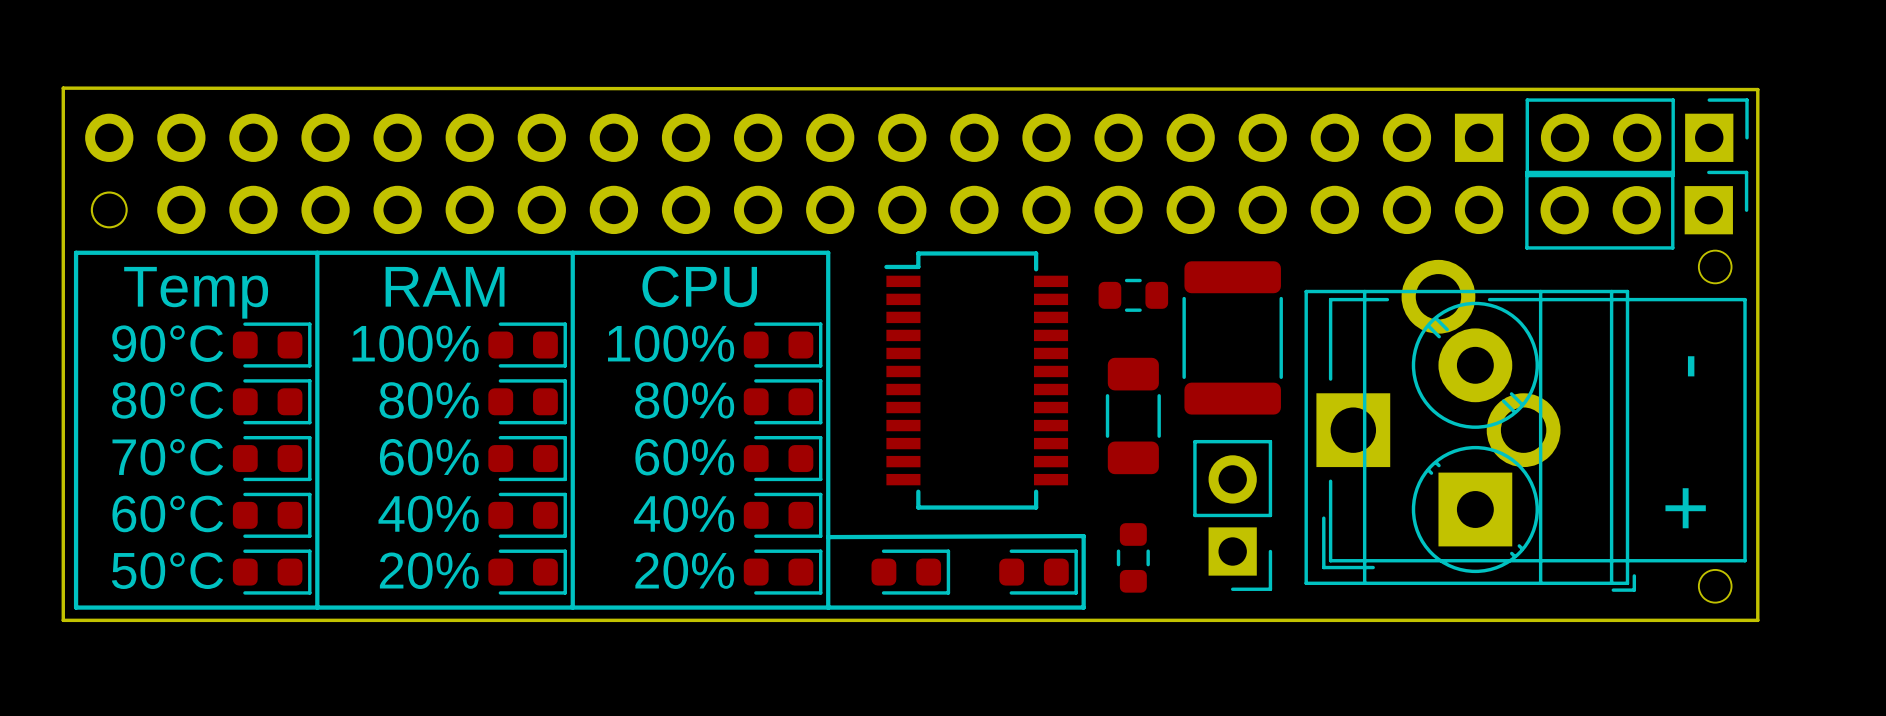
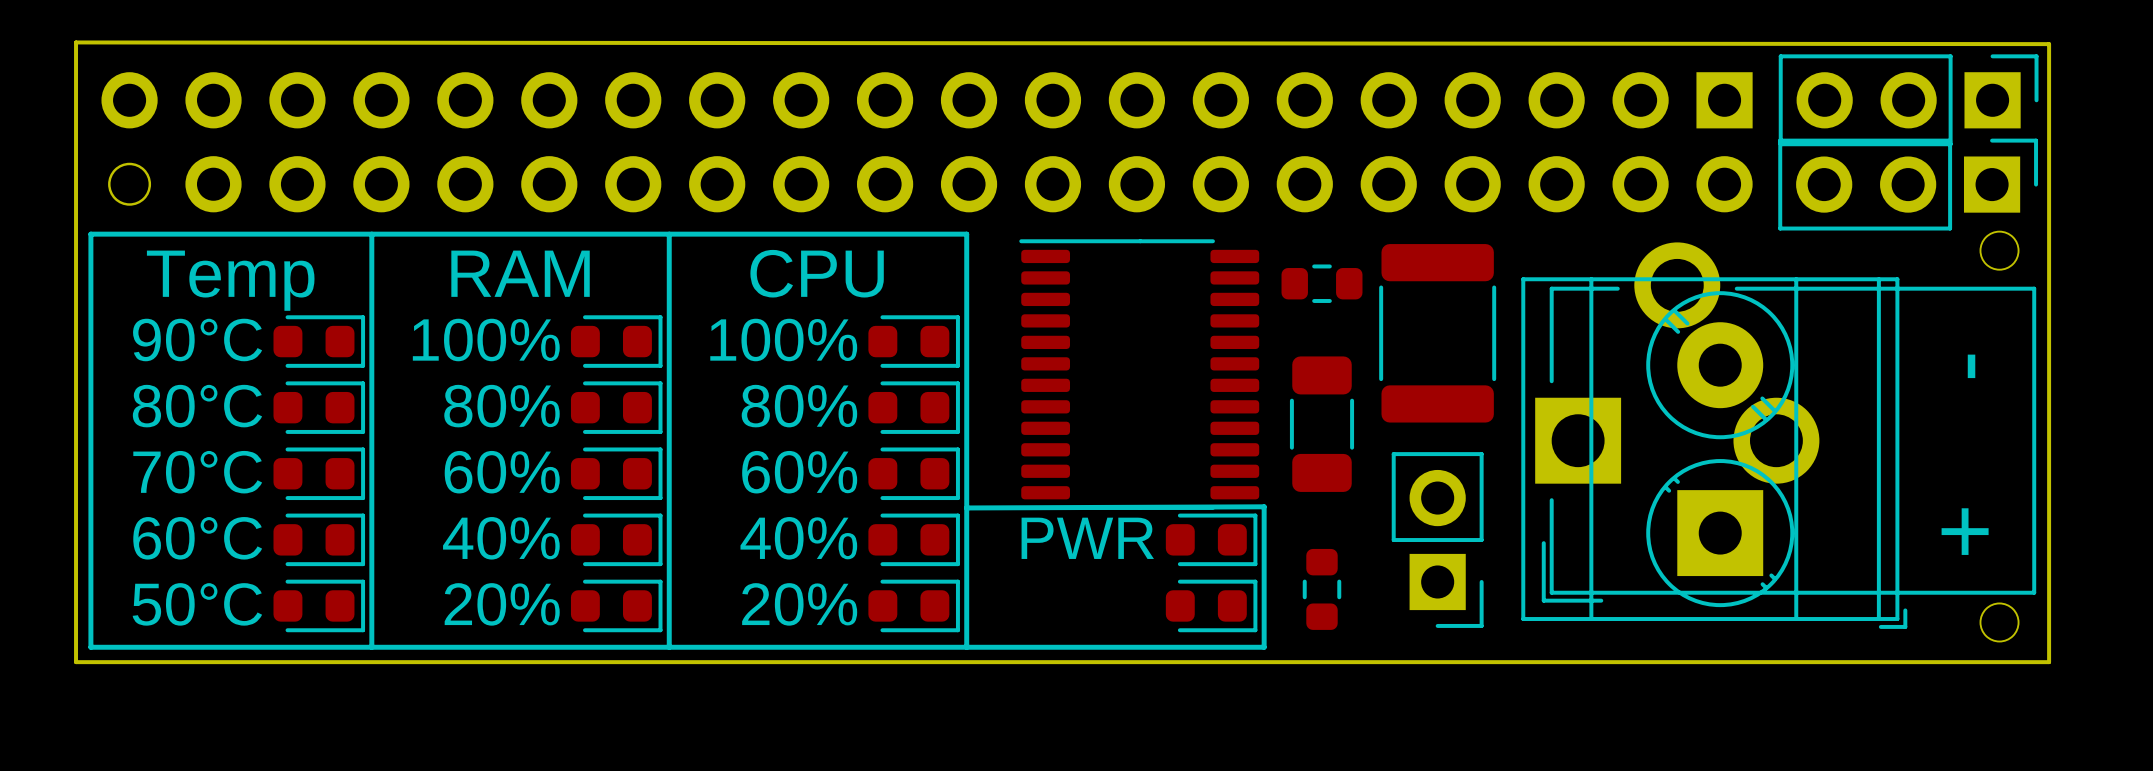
part footprint: [884, 251, 1069, 510] -> [1019, 239, 1260, 510]
part: none -> (1211, 539)
line: (1083, 536) (828, 537) -> (1264, 564) (1264, 506) (966, 507)
part: (910, 572) -> none

